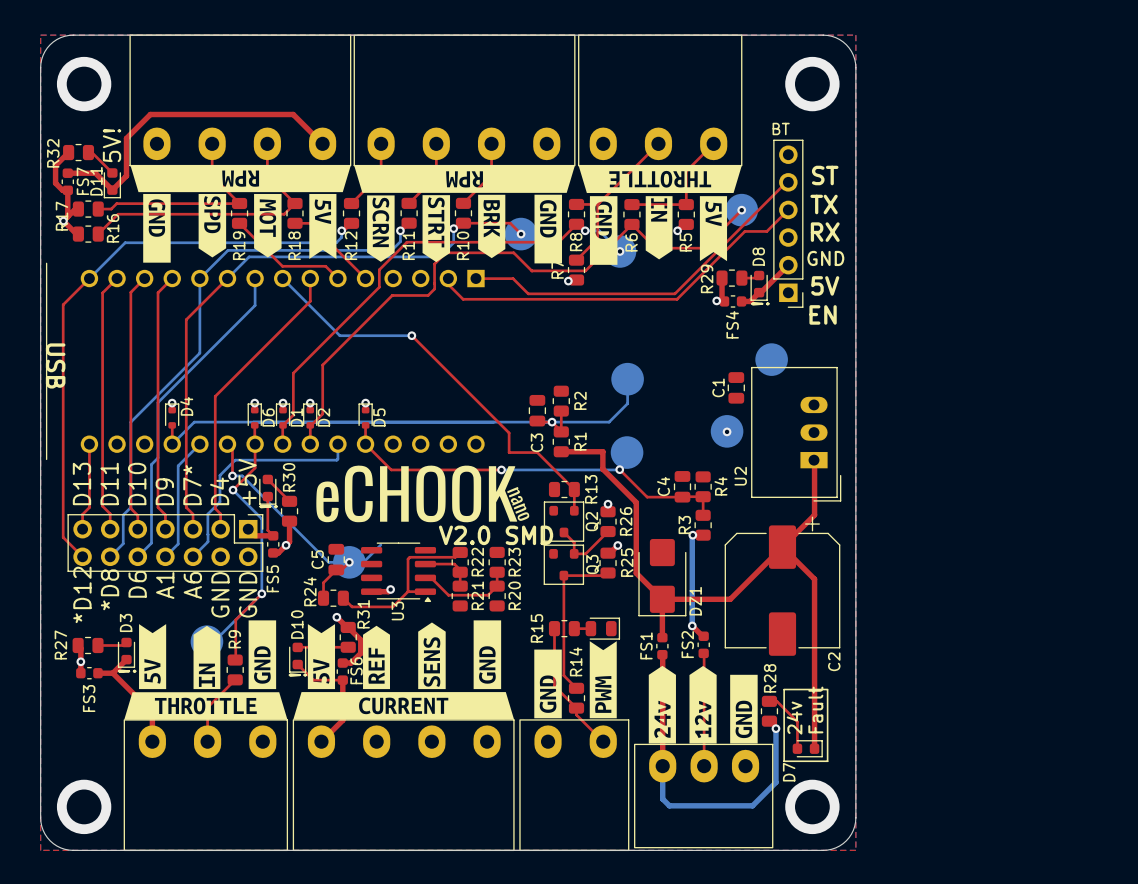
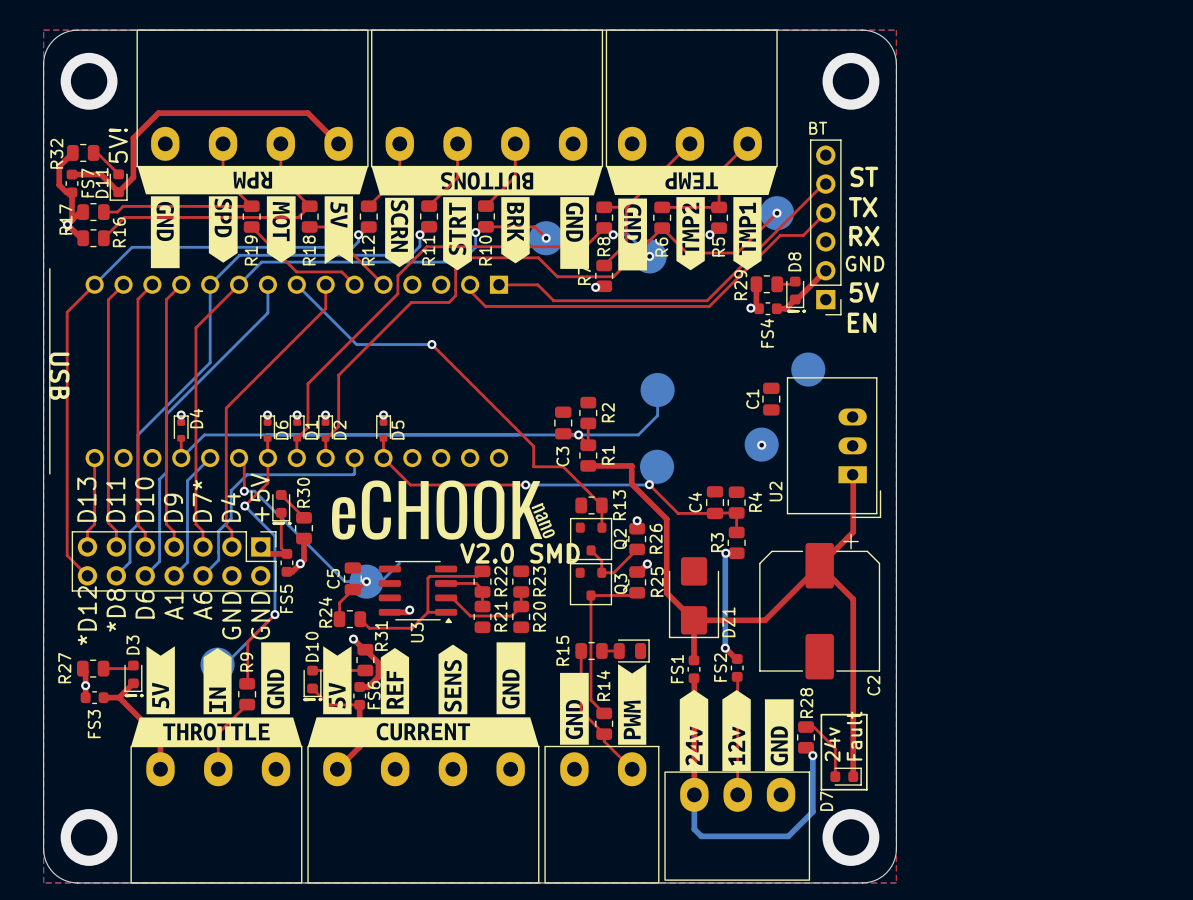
drawing shape: [354, 165, 575, 193] -> [371, 166, 603, 196]
drawing shape: [578, 165, 742, 194] -> [606, 166, 777, 195]
drawing shape: [422, 195, 451, 263] -> [443, 197, 472, 271]
drawing shape: [645, 196, 673, 260] -> [676, 197, 705, 271]
drawing shape: [699, 196, 728, 262] -> [733, 197, 762, 271]

